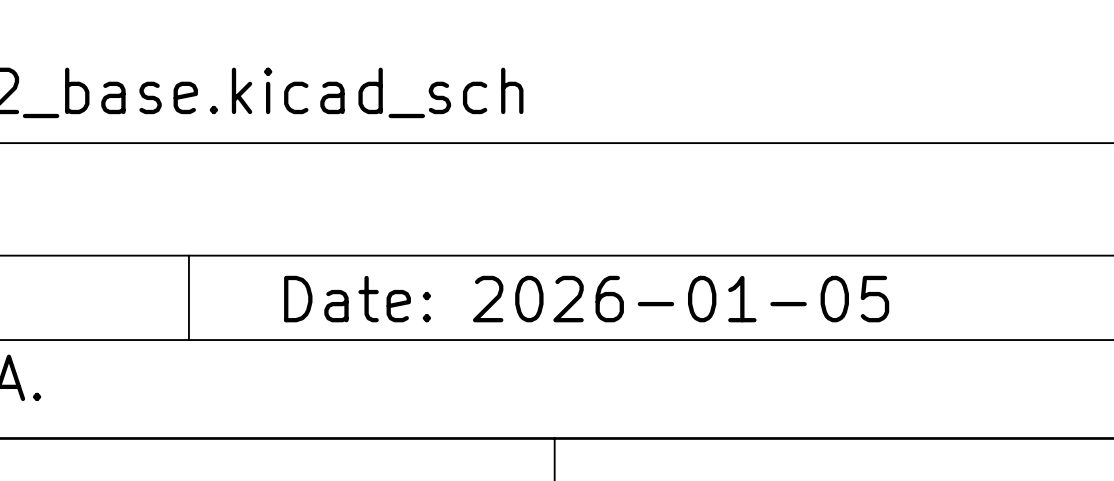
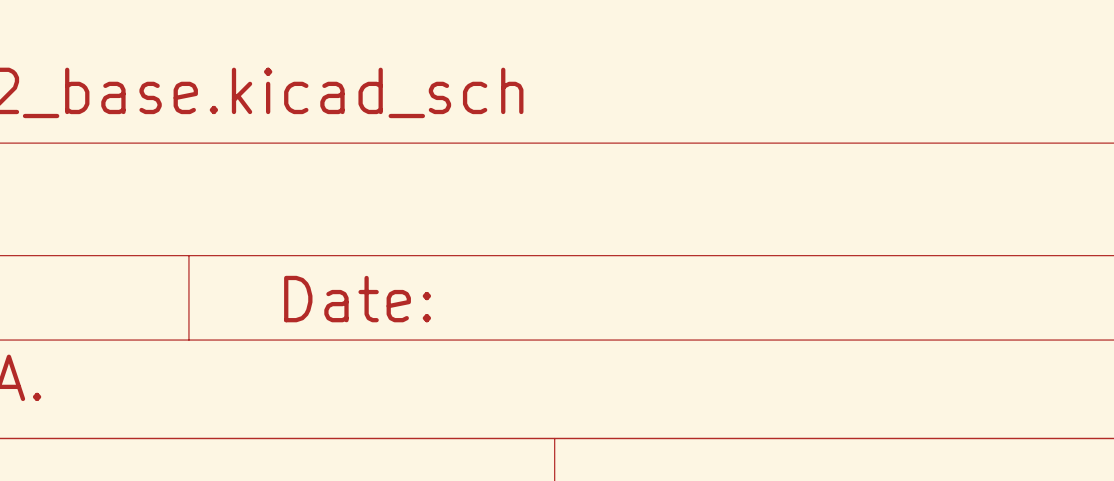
title block: Date: 2026-01-05 (586, 299) -> Date: (357, 299)

